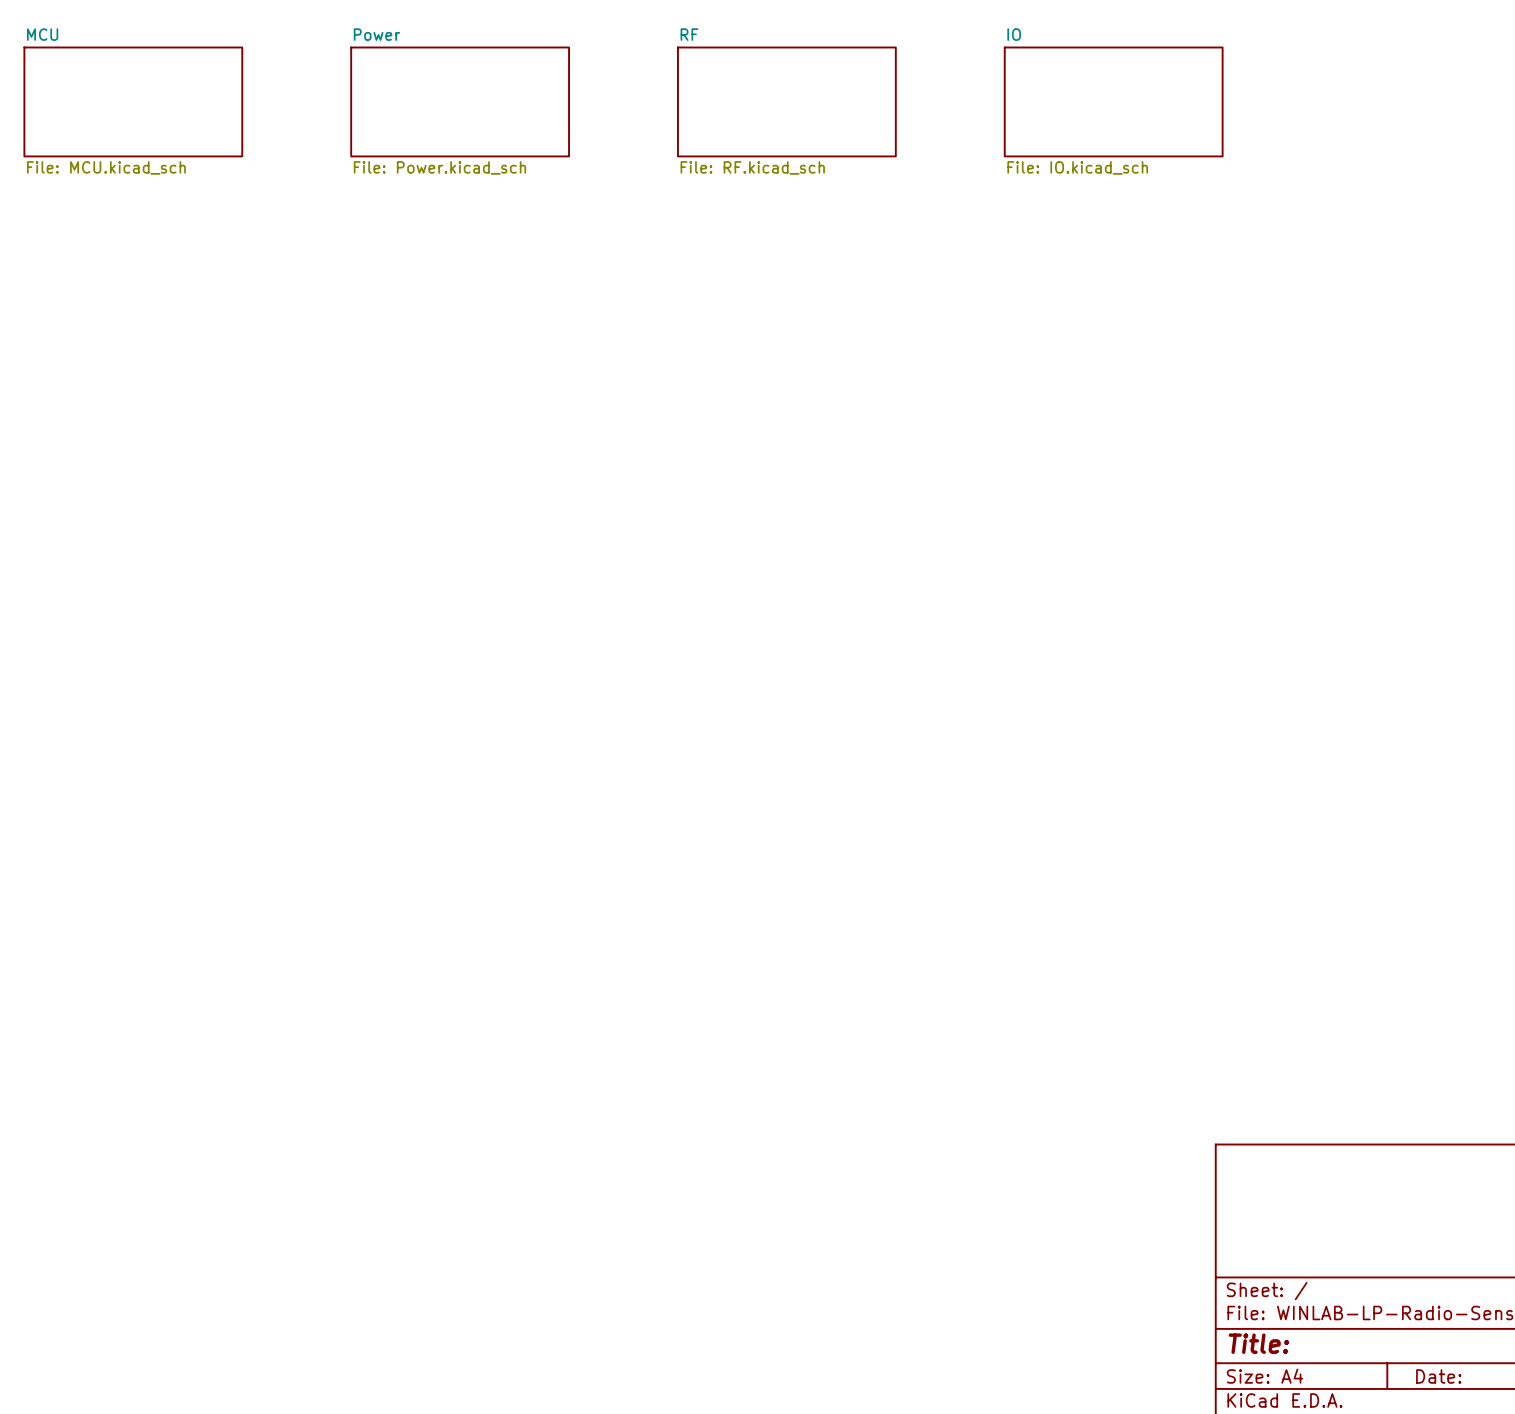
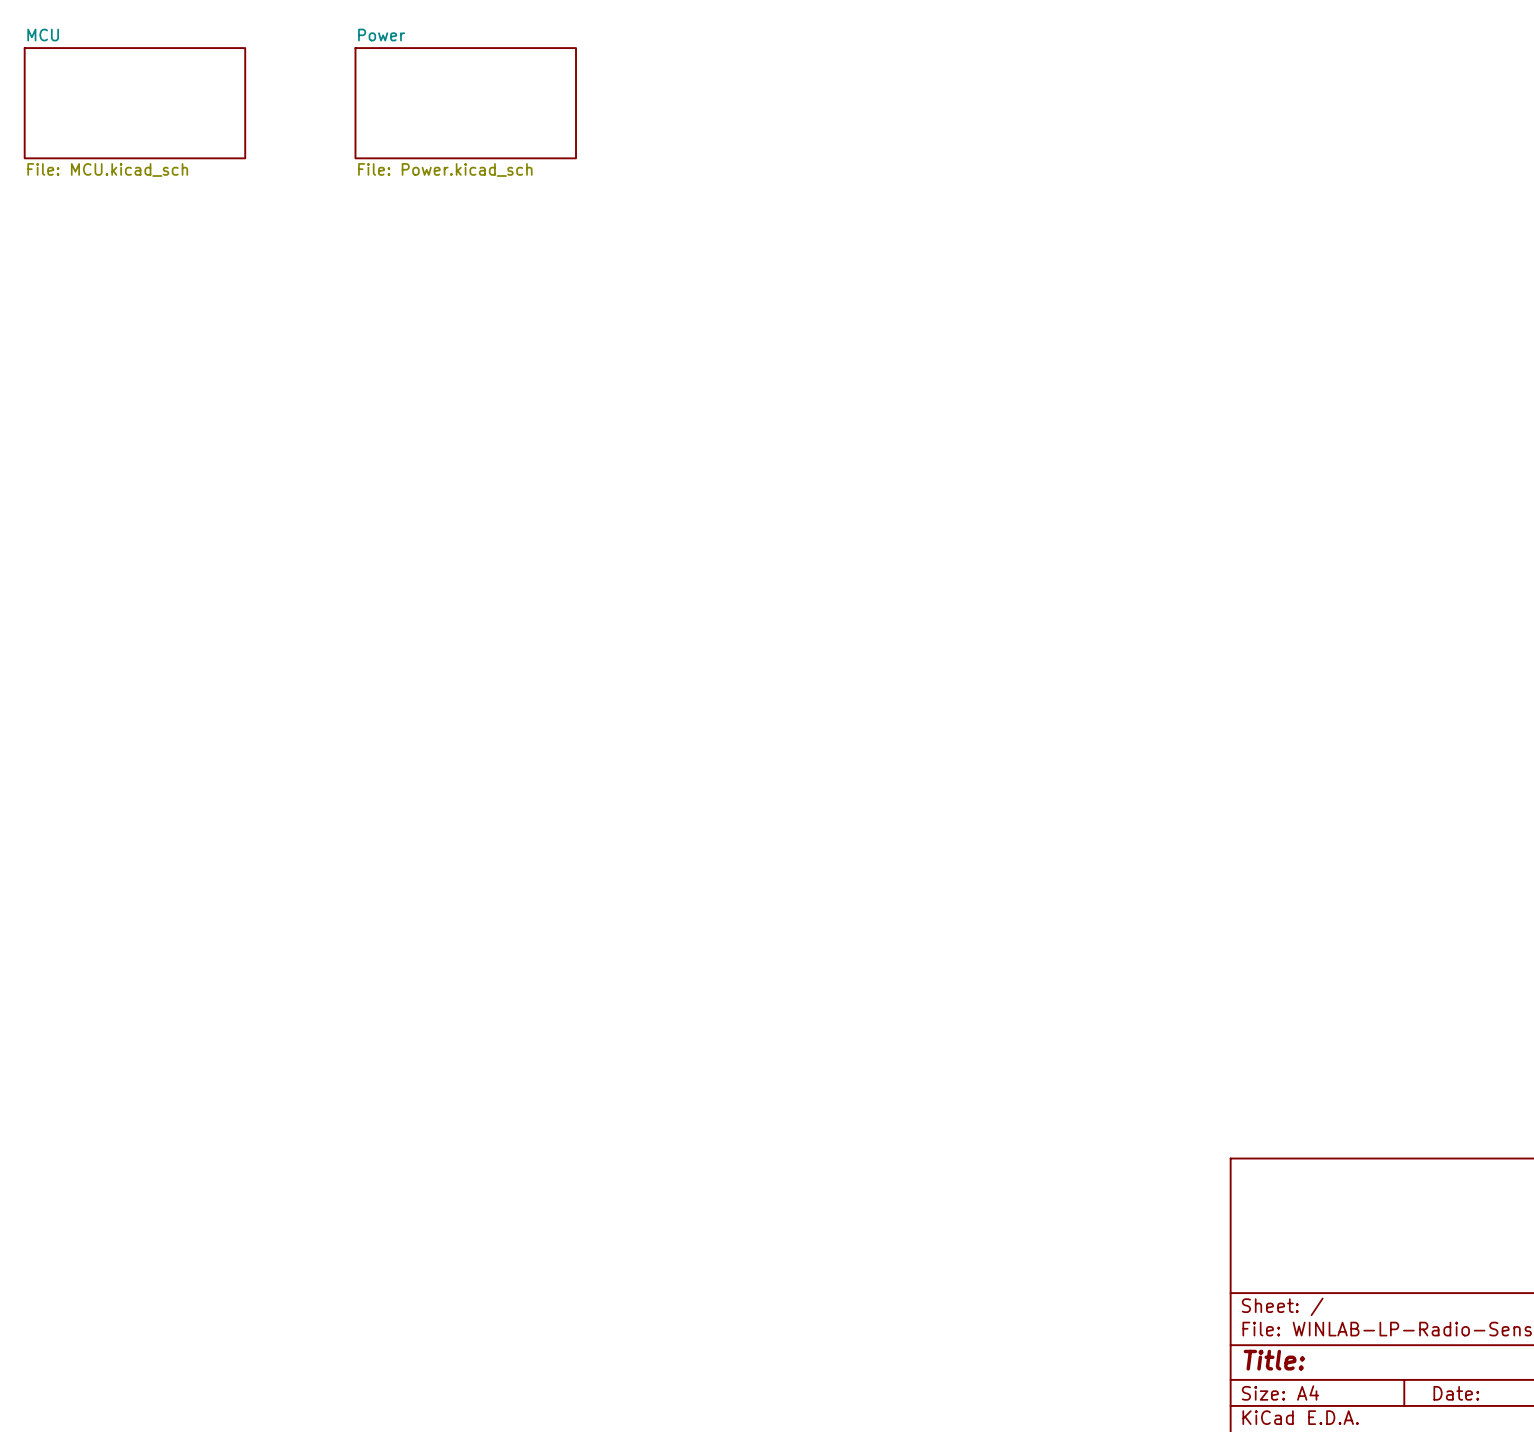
sheet RF: File: RF.kicad_sch (786, 101) -> none
sheet IO: File: IO.kicad_sch (1113, 101) -> none

